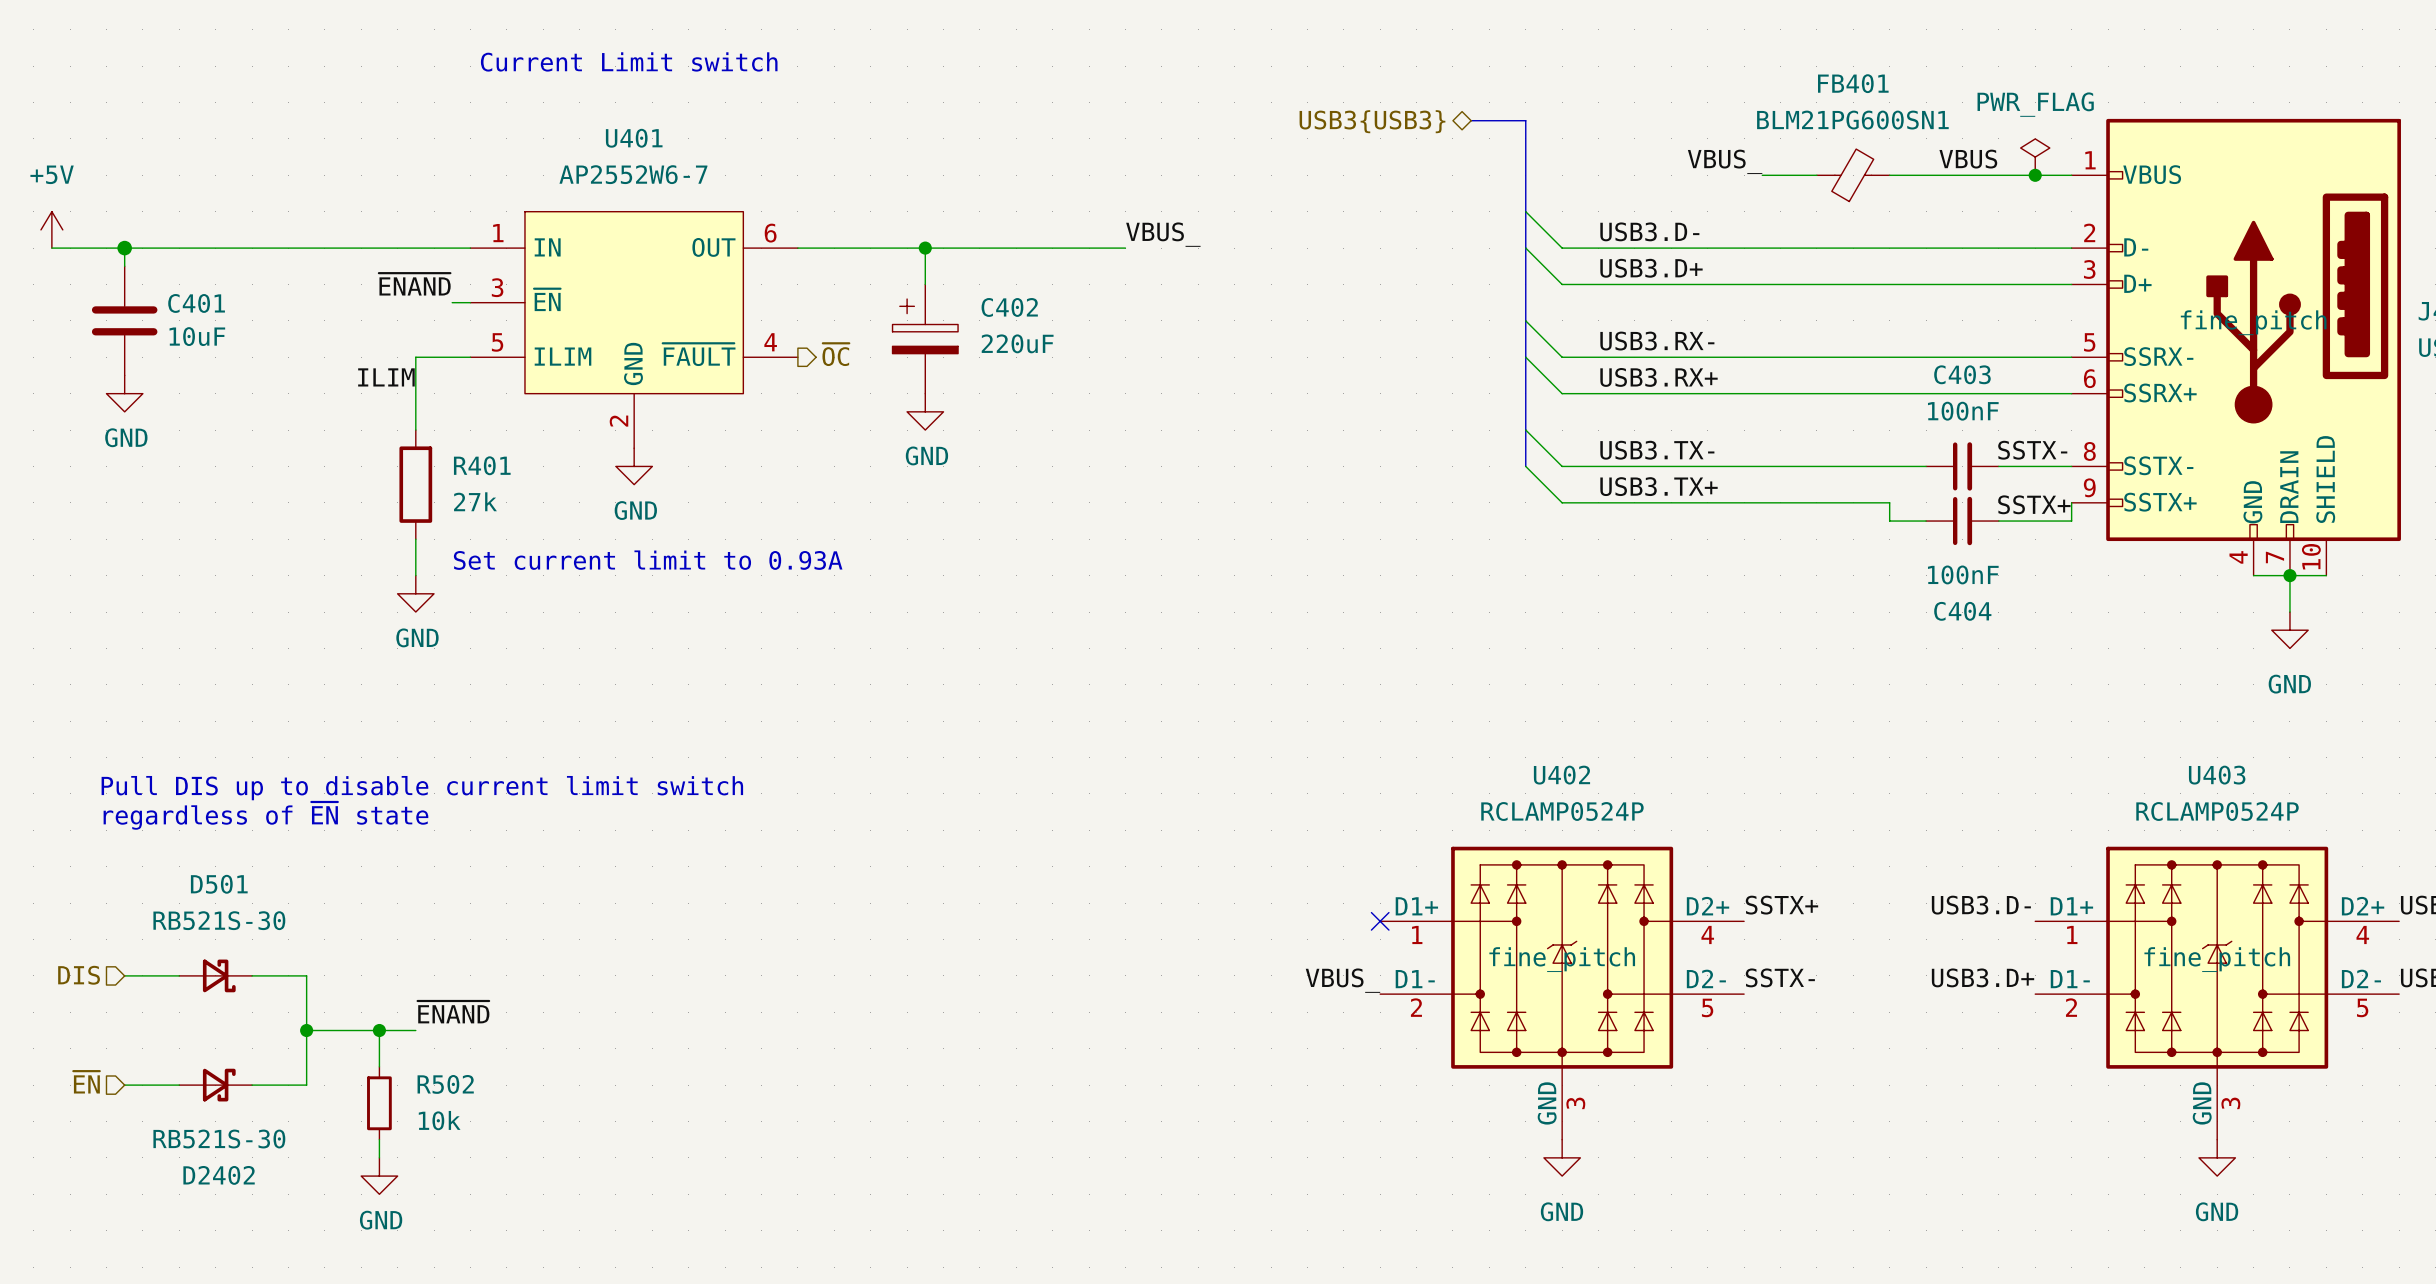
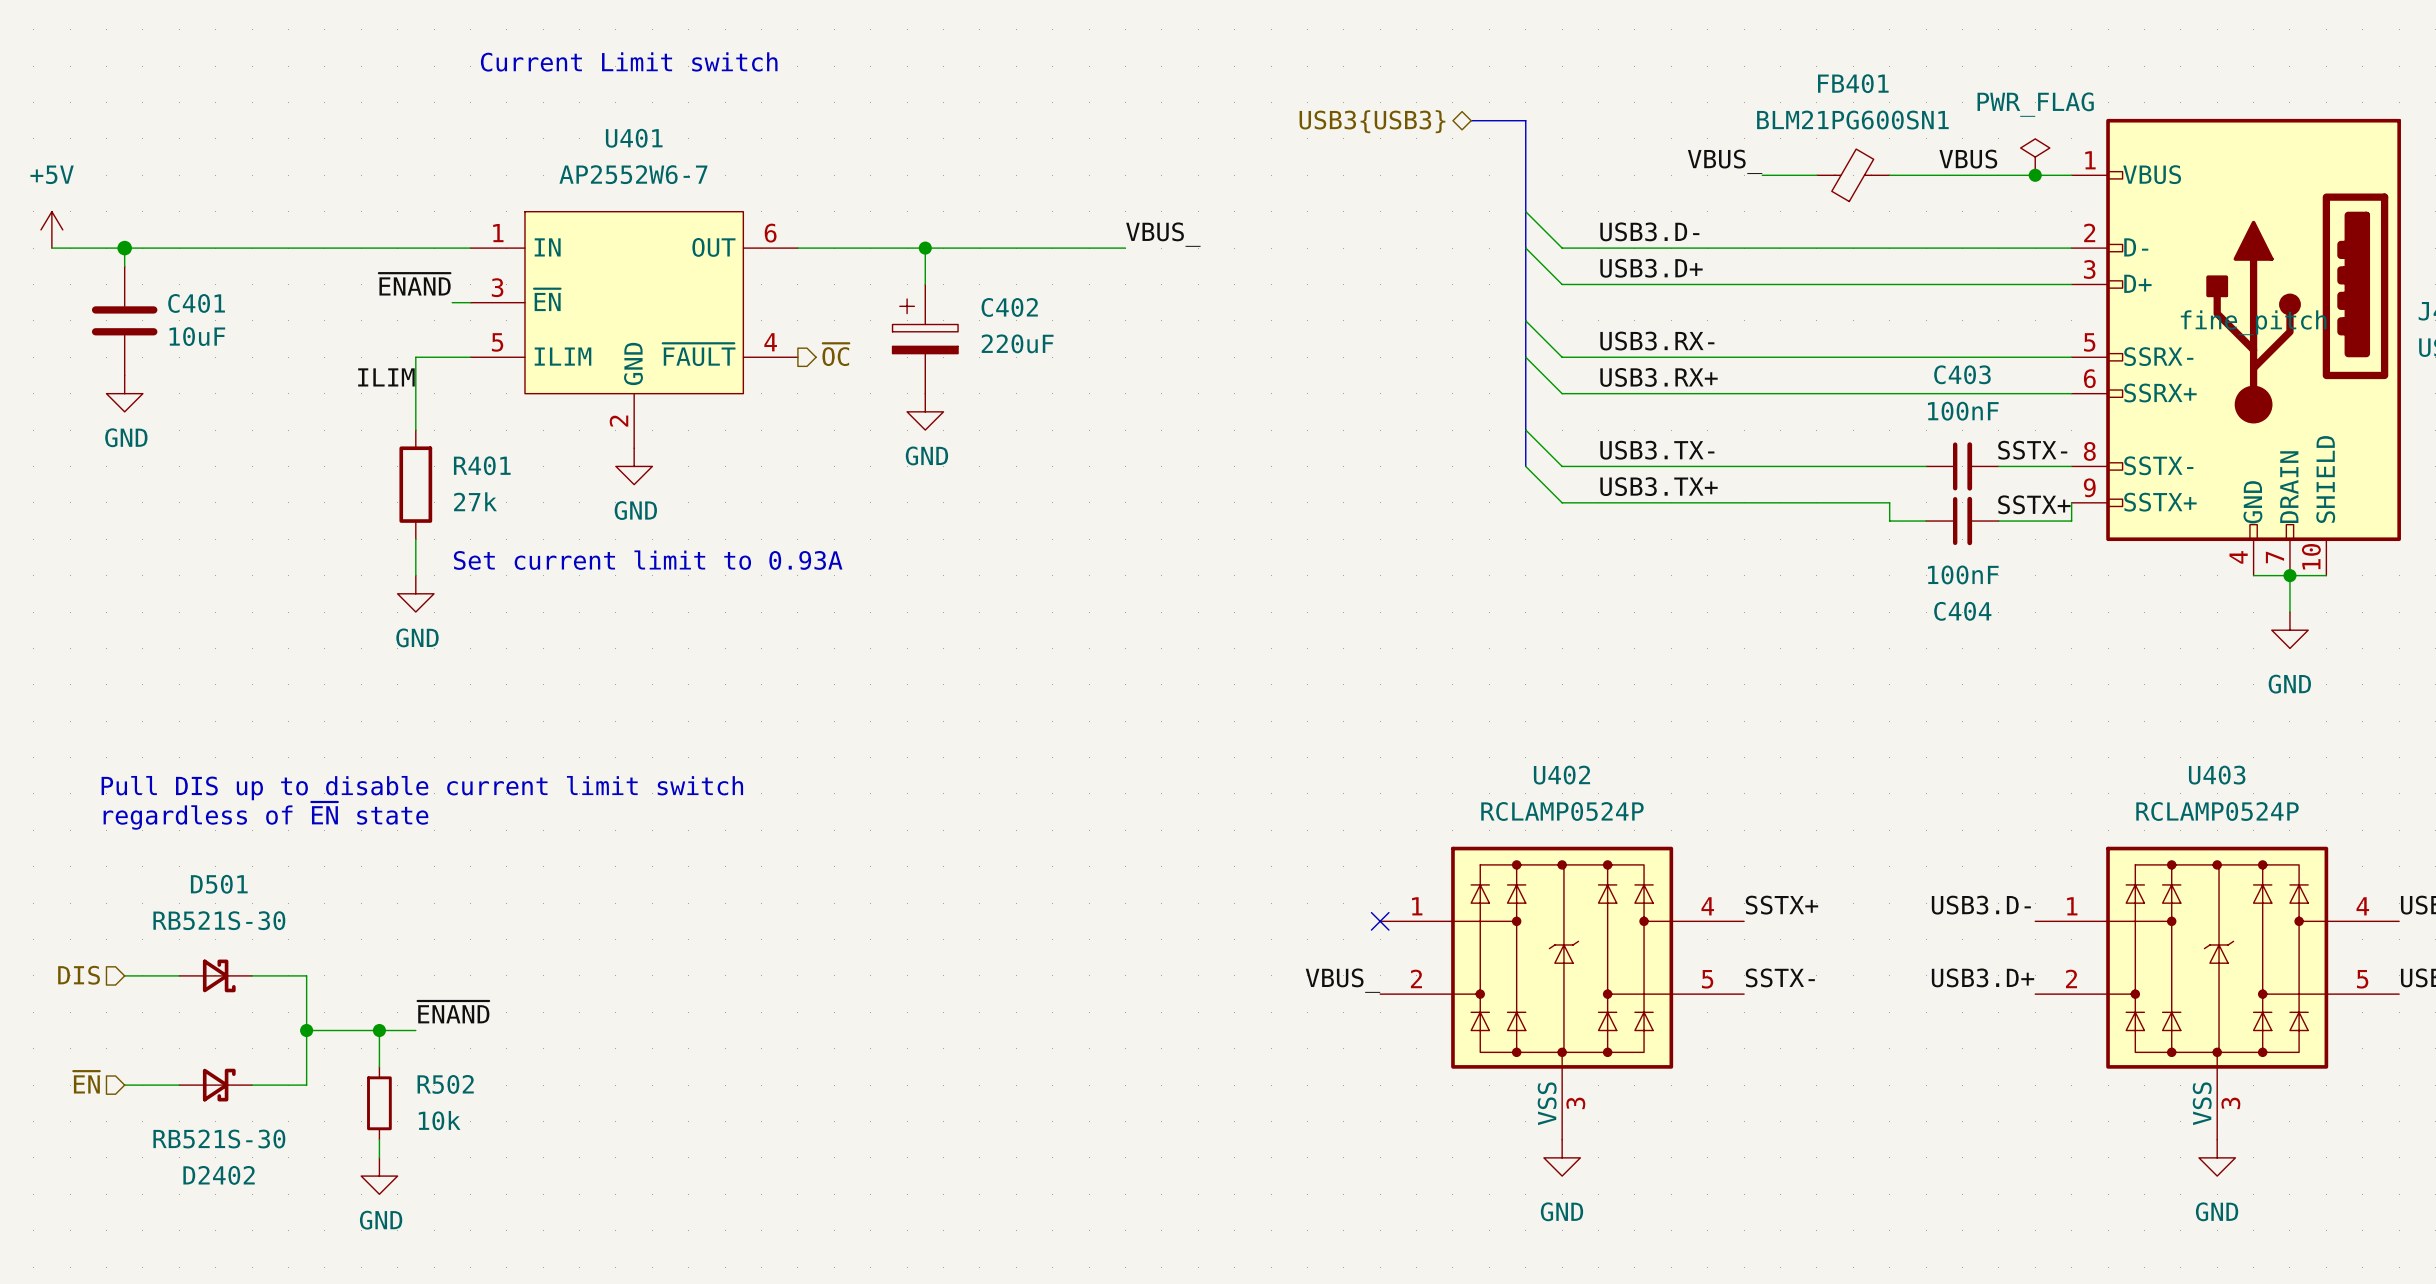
U402 symbol: [1380, 846, 1745, 1140] -> [1380, 846, 1745, 1140]
U403 symbol: [2035, 846, 2400, 1140] -> [2035, 846, 2400, 1140]
U402 text: fine_pitch (1562, 959) -> none
U403 text: fine_pitch (2217, 959) -> none

